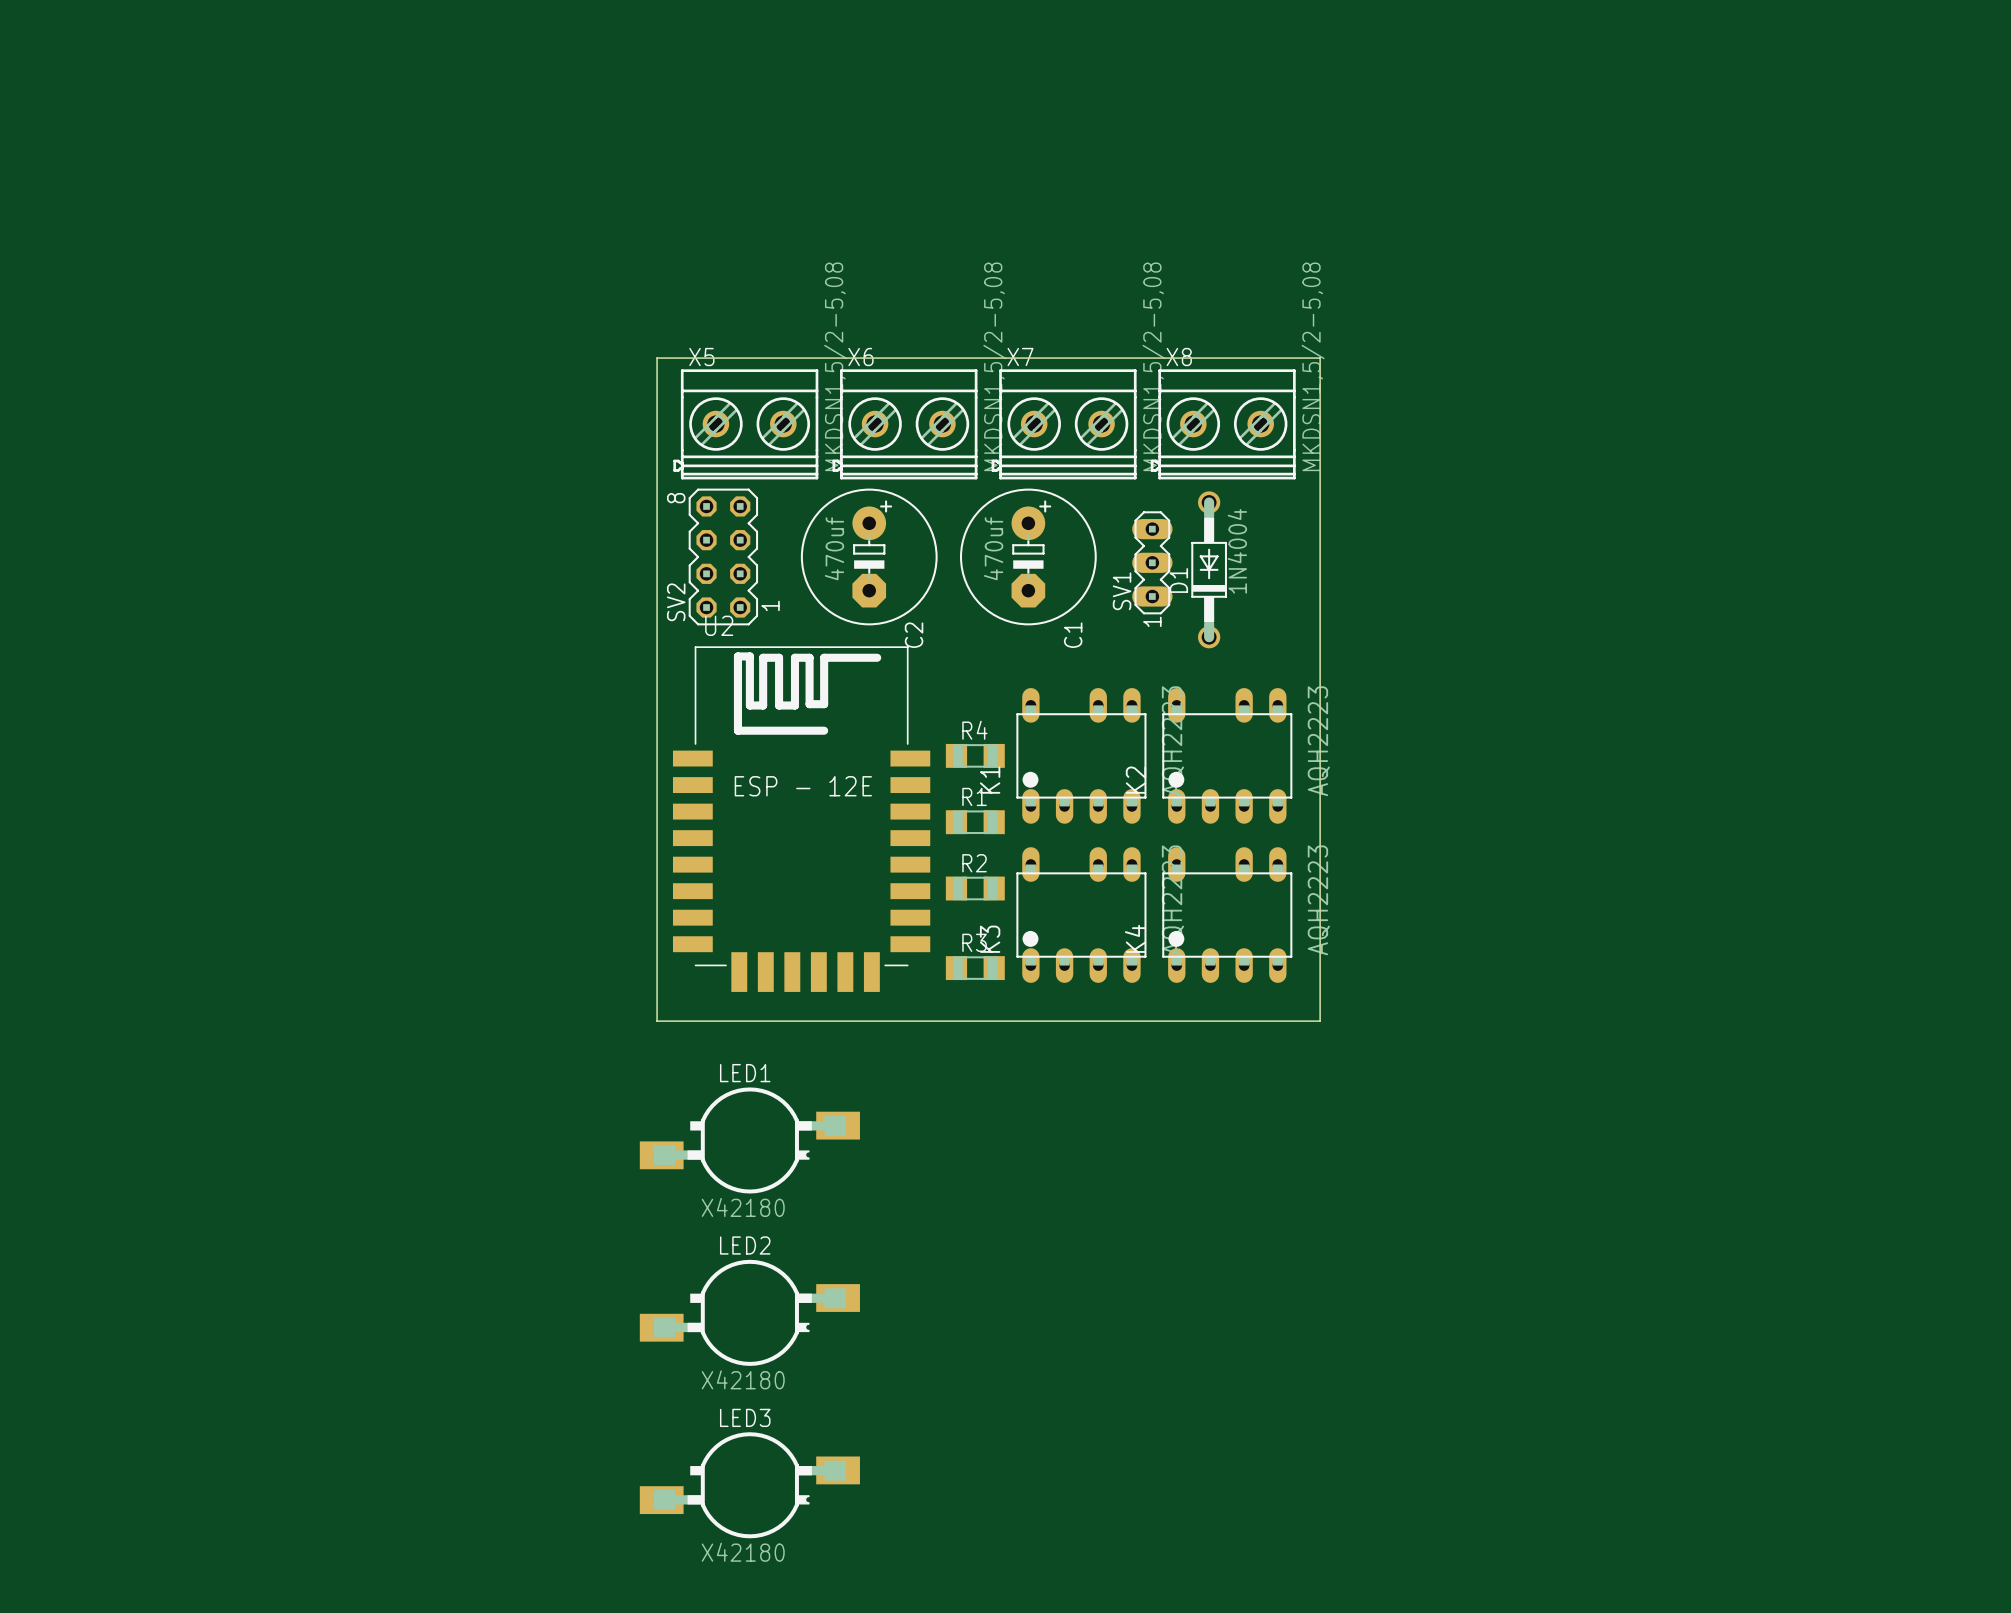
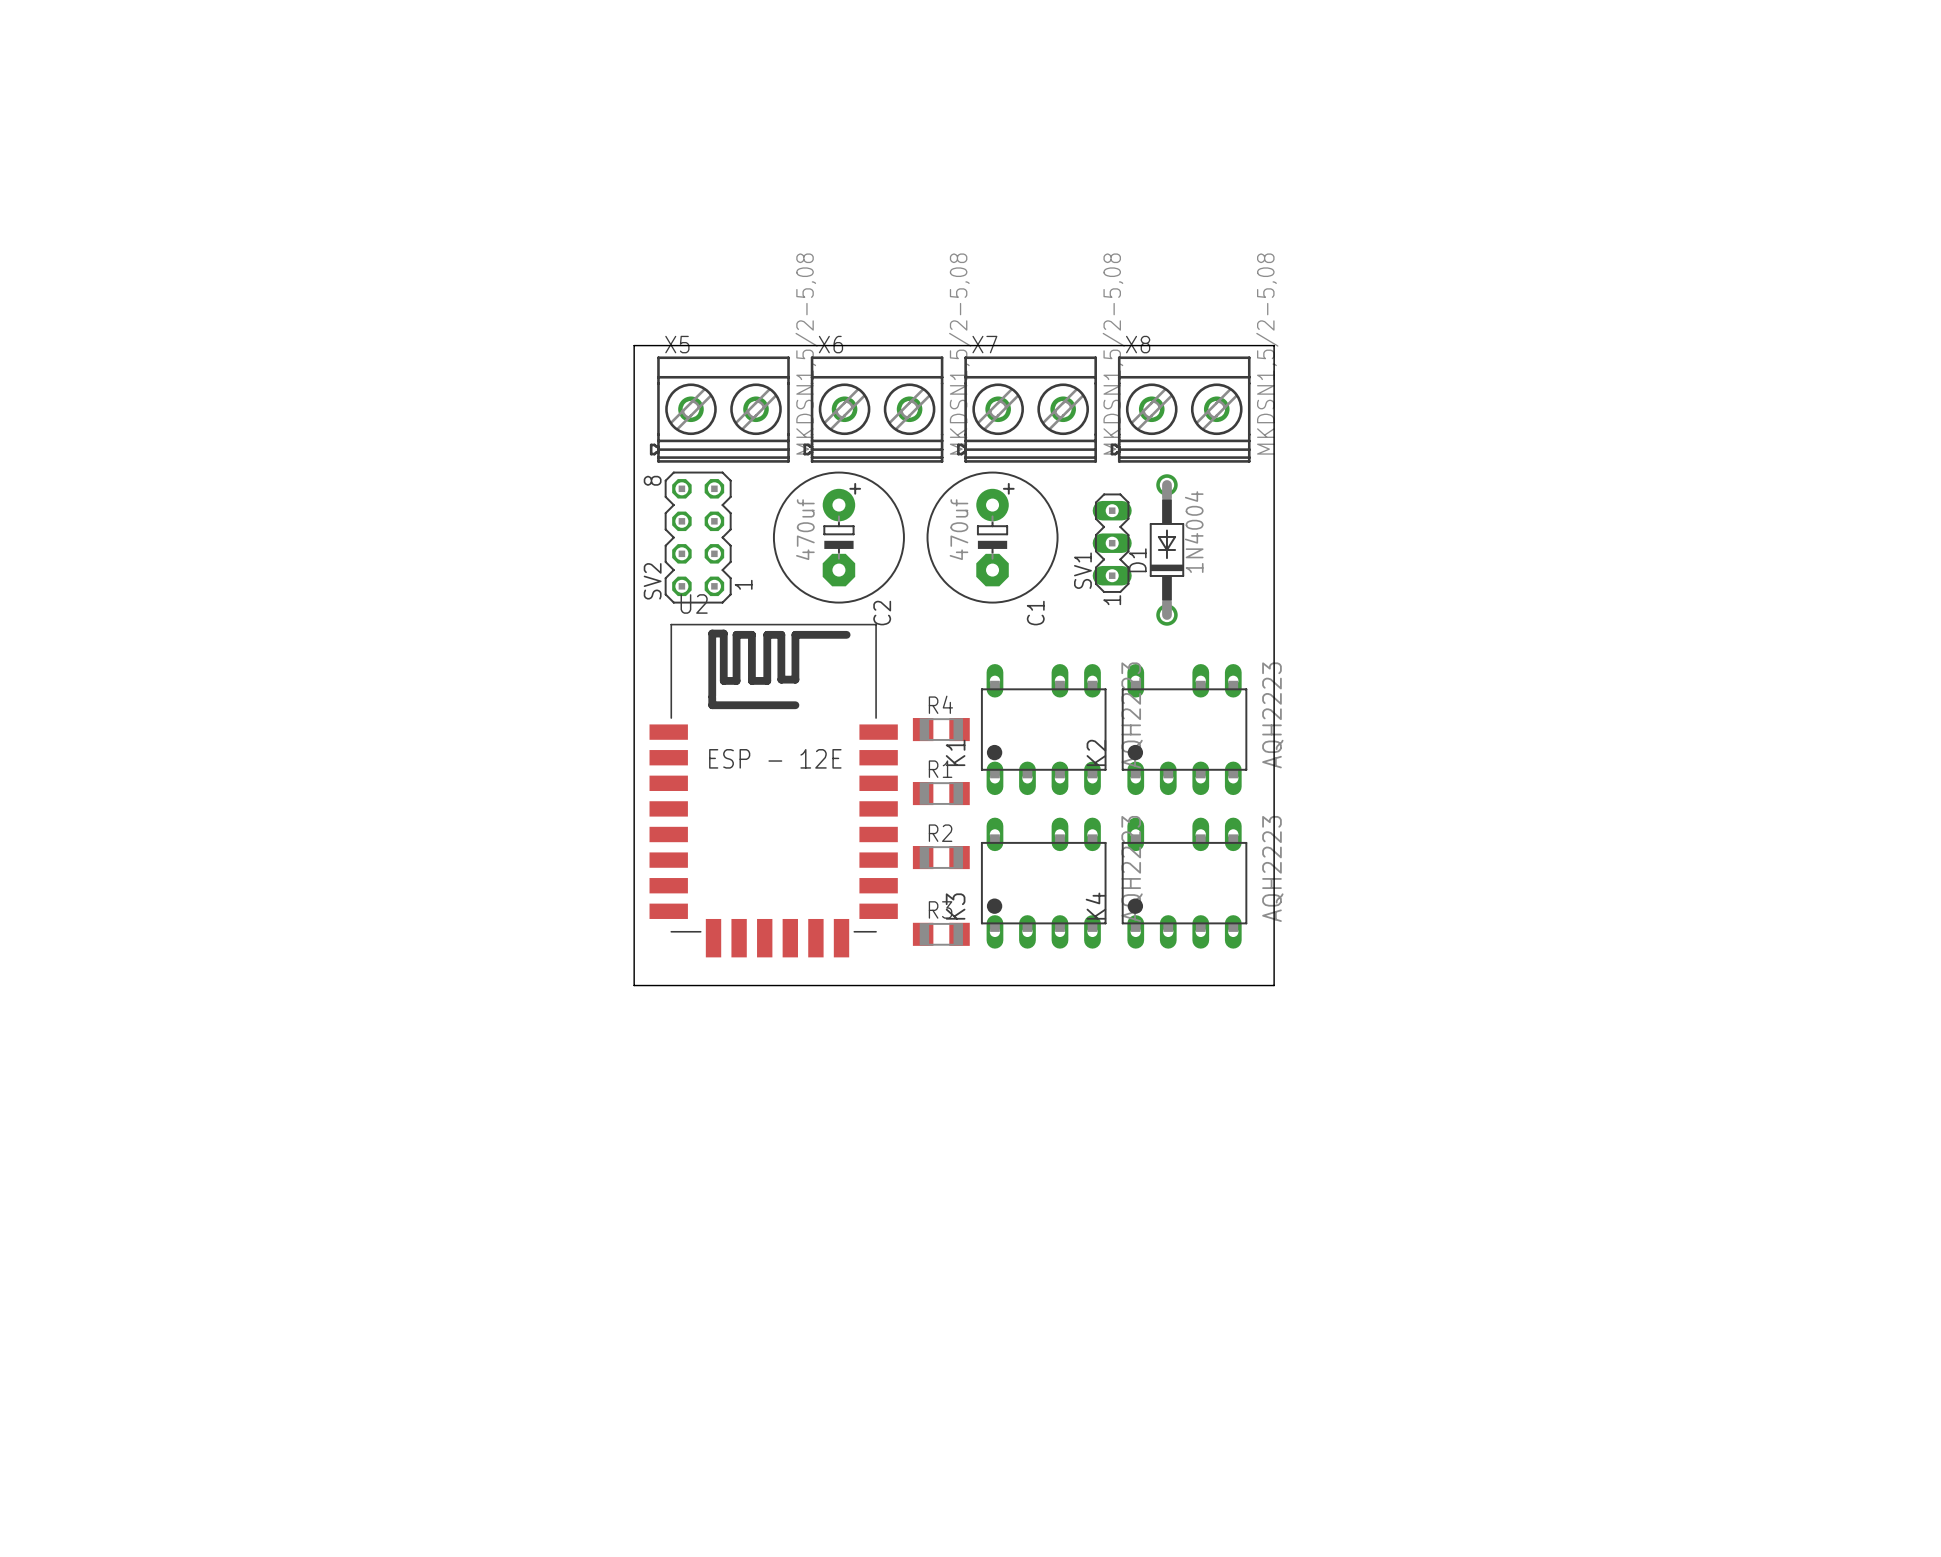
LED1: X42180 (749, 1140) -> none
LED2: X42180 (749, 1312) -> none
LED3: X42180 (749, 1485) -> none

